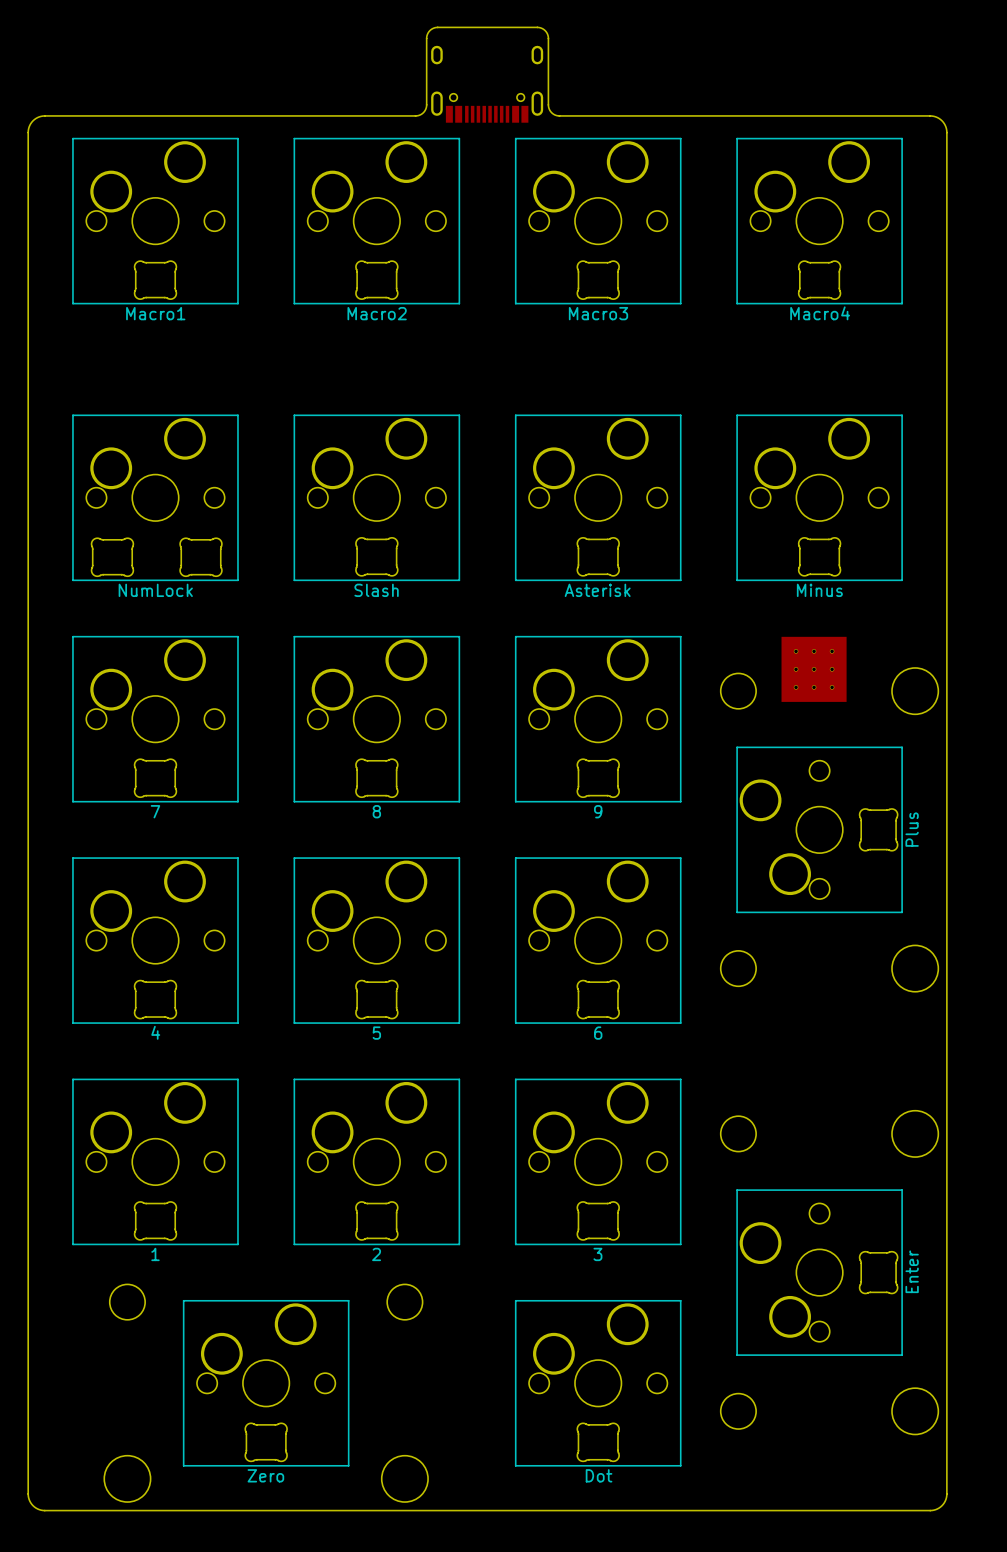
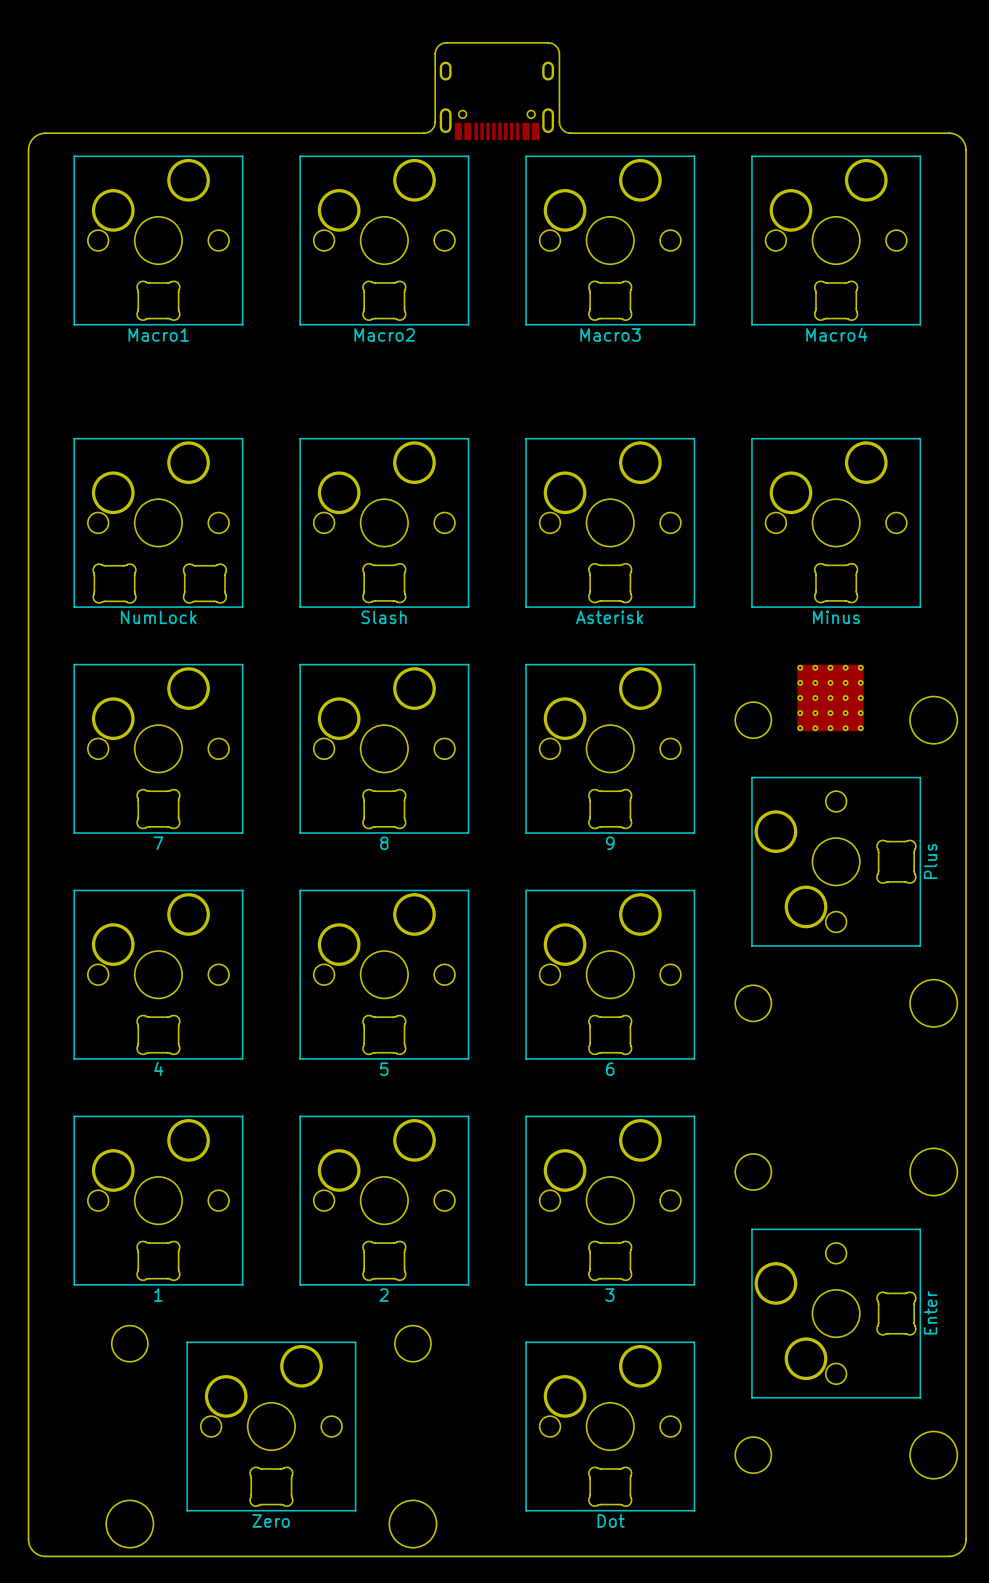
part footprint: [781, 636, 847, 702] -> [797, 664, 864, 732]

